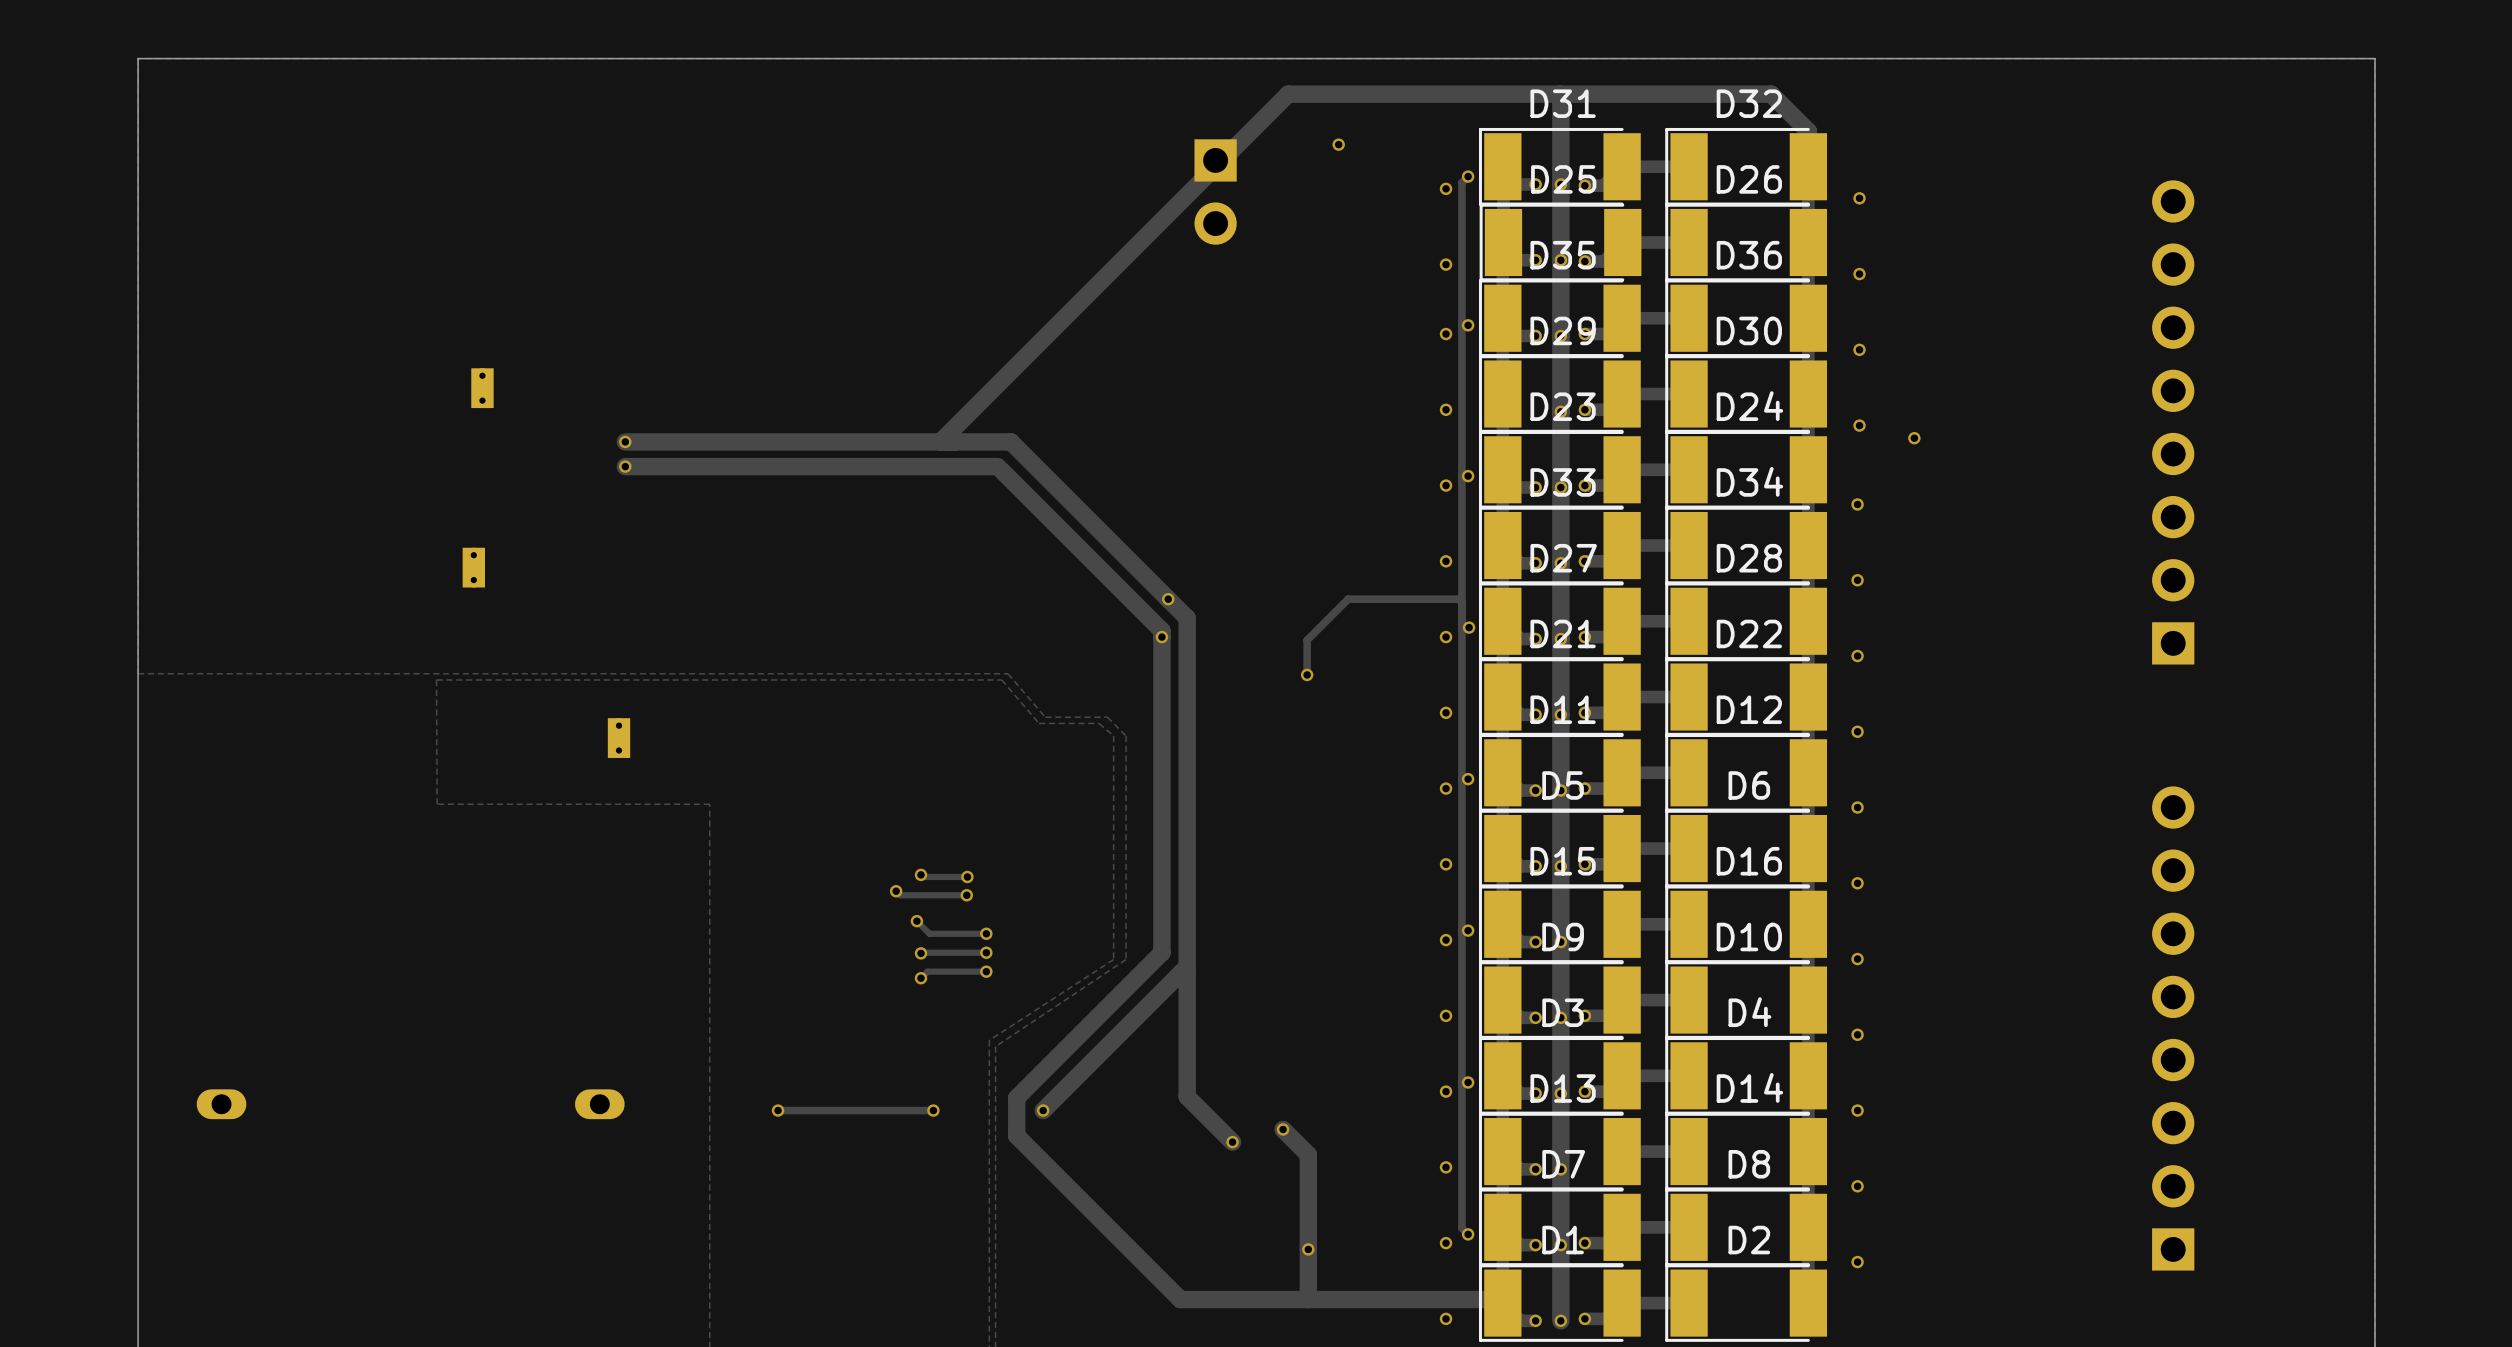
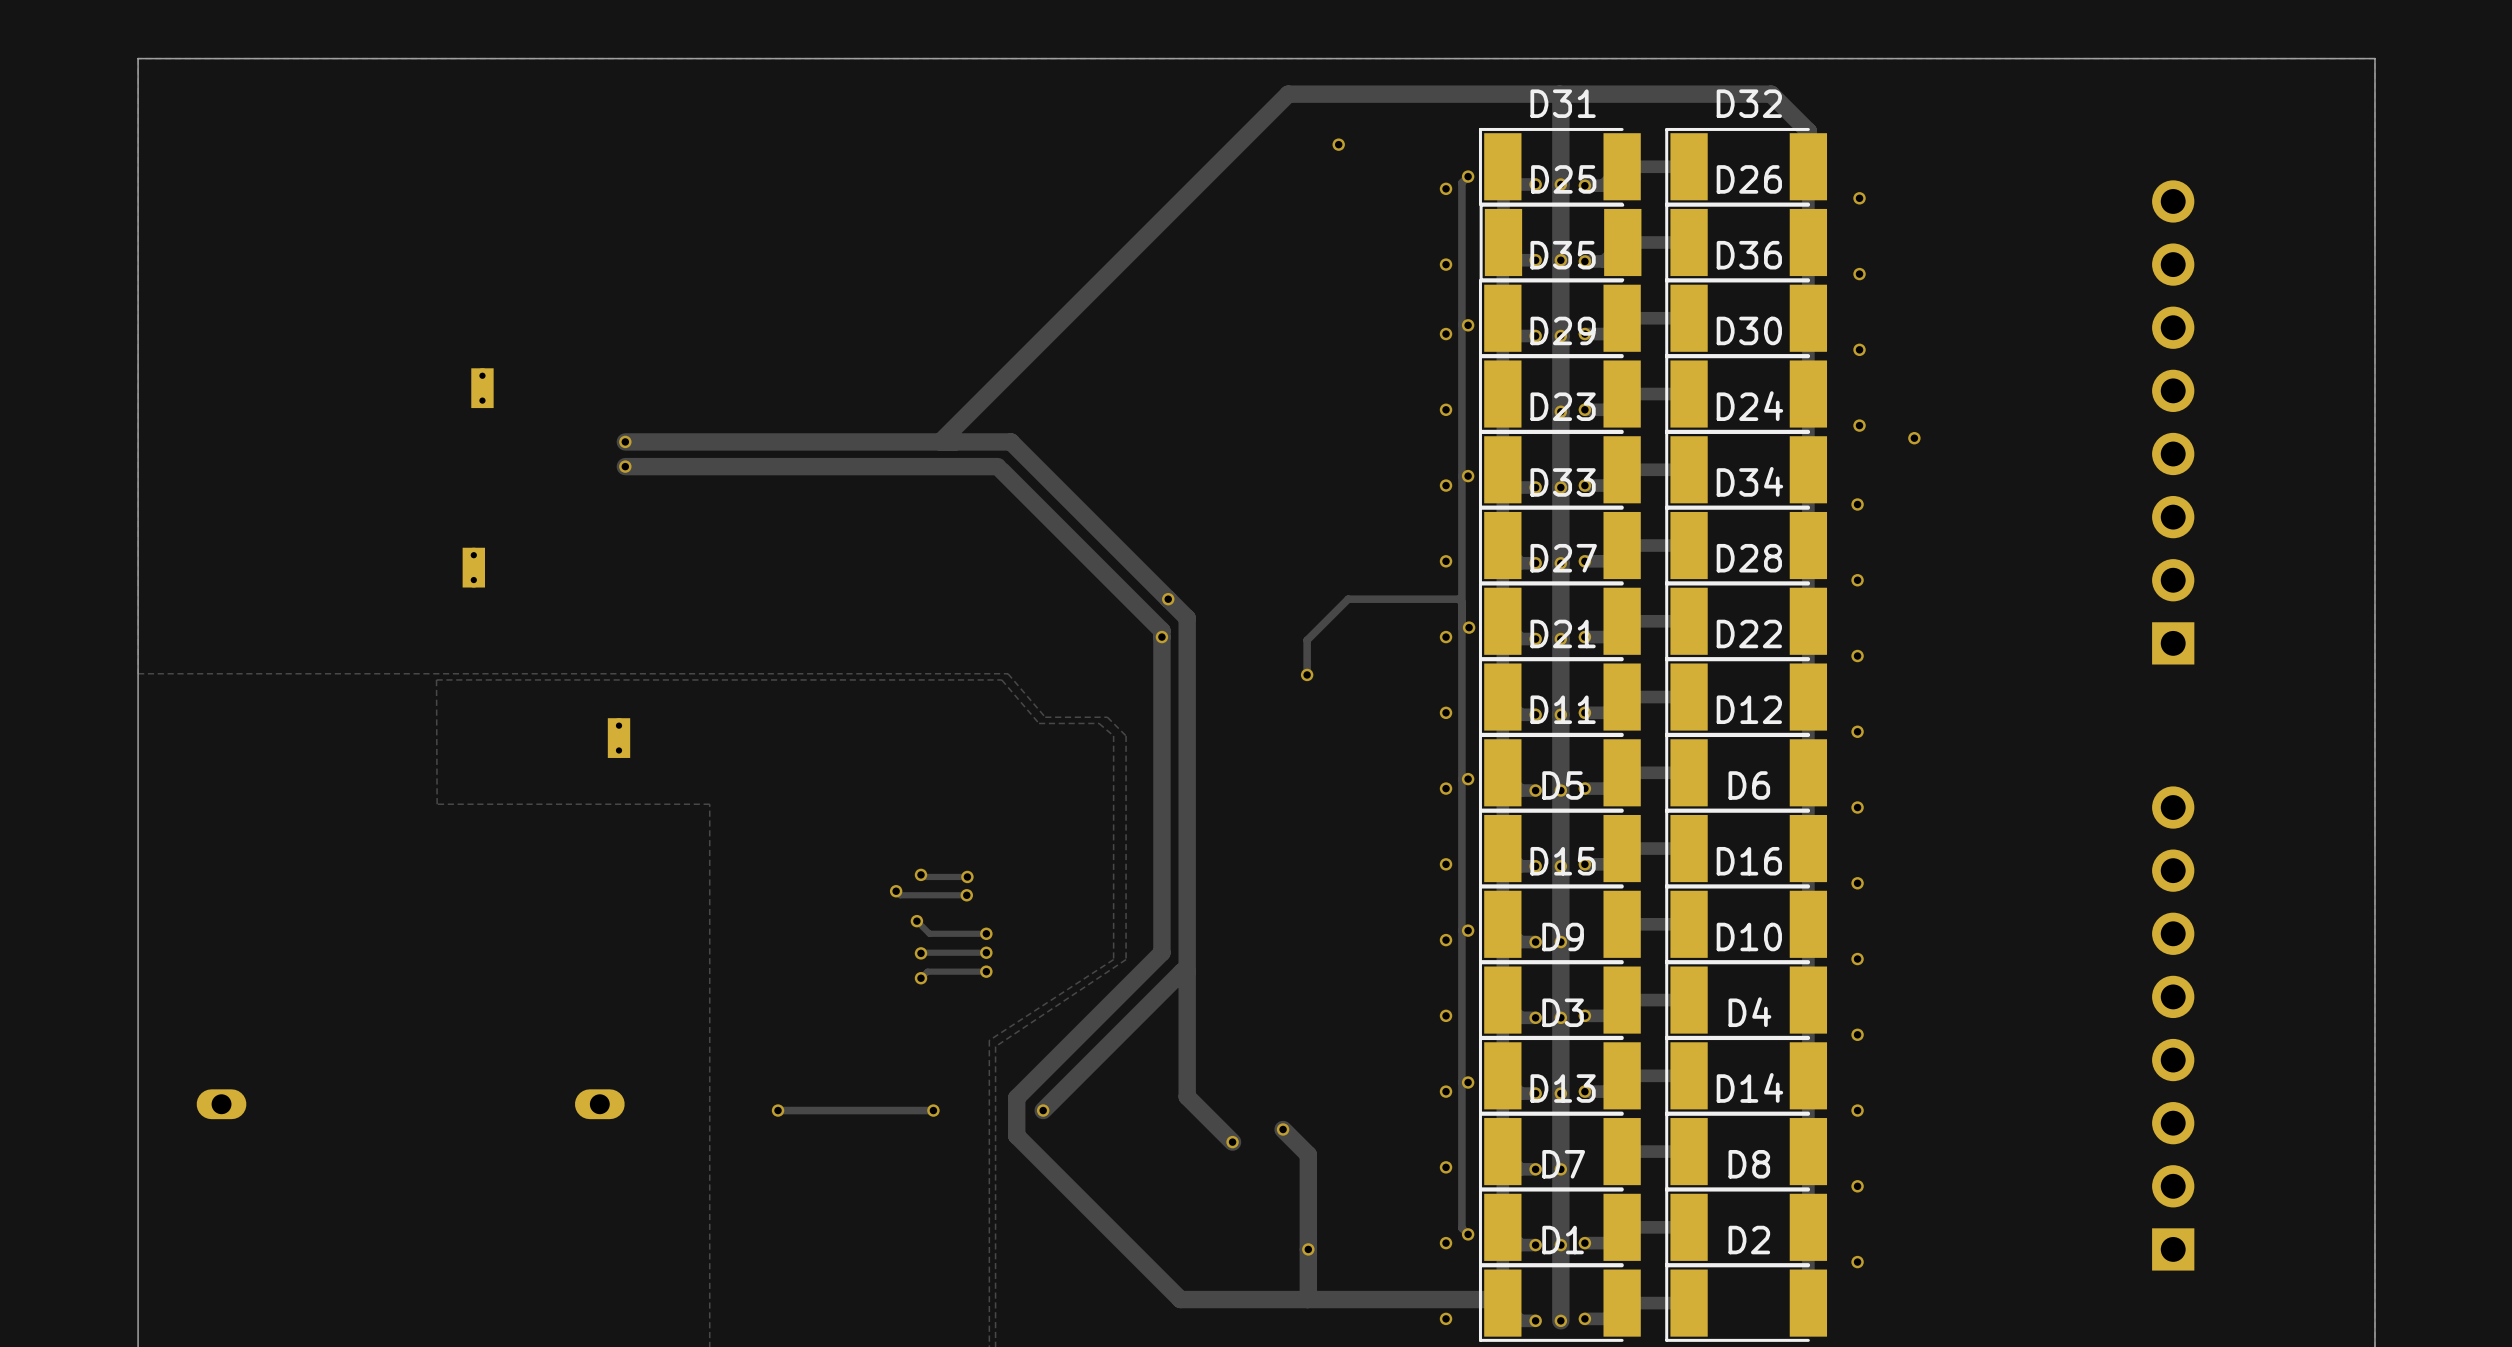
part: (1215, 191) -> none

